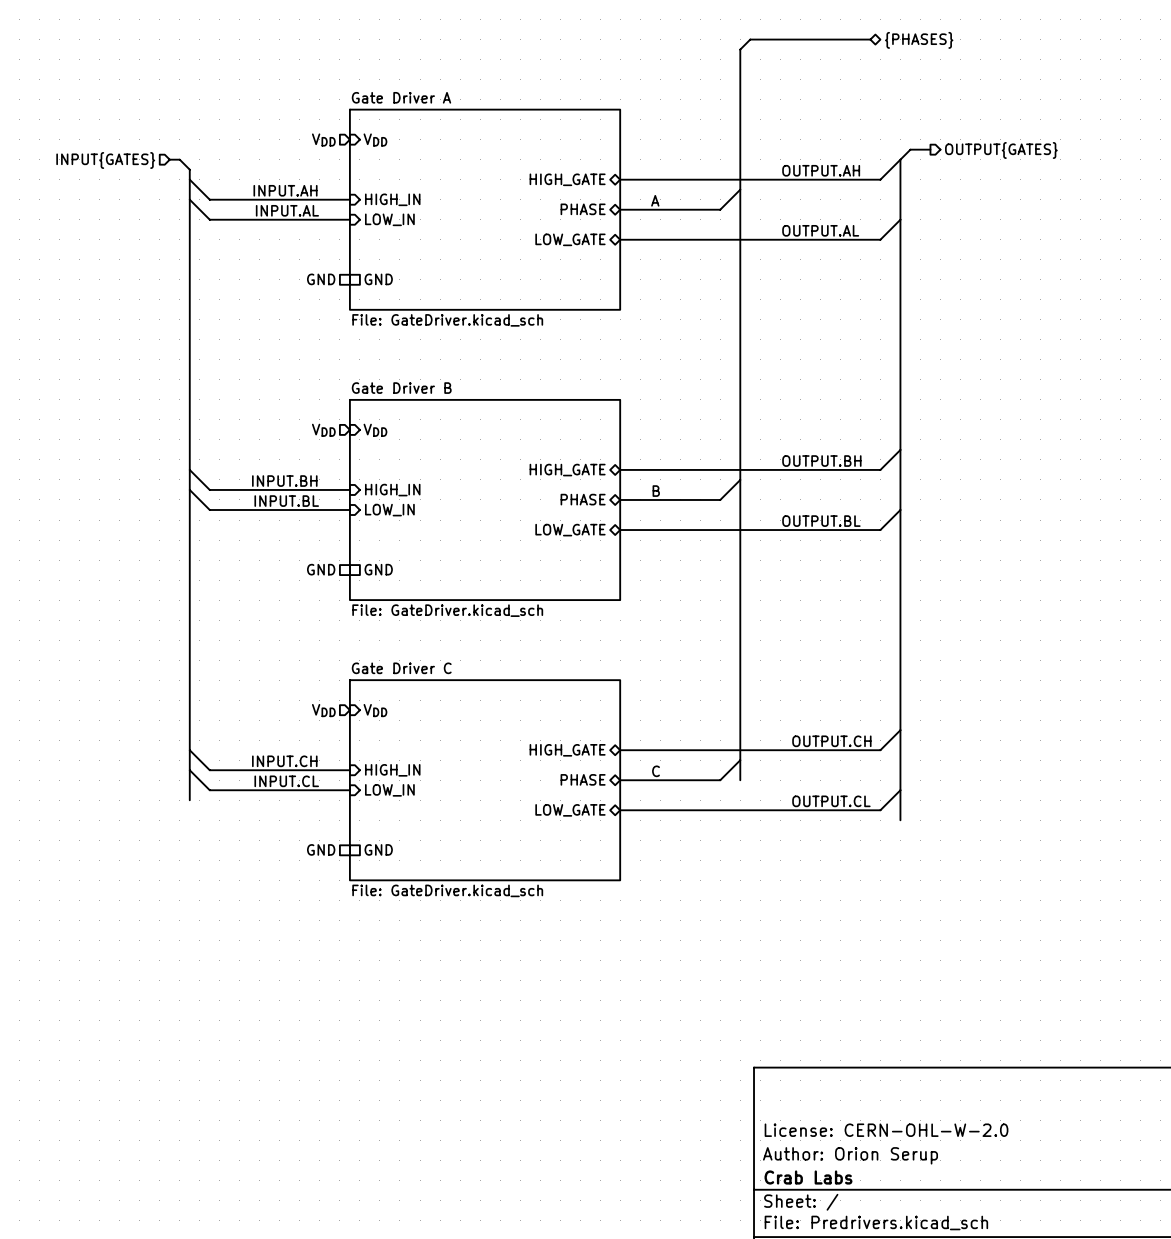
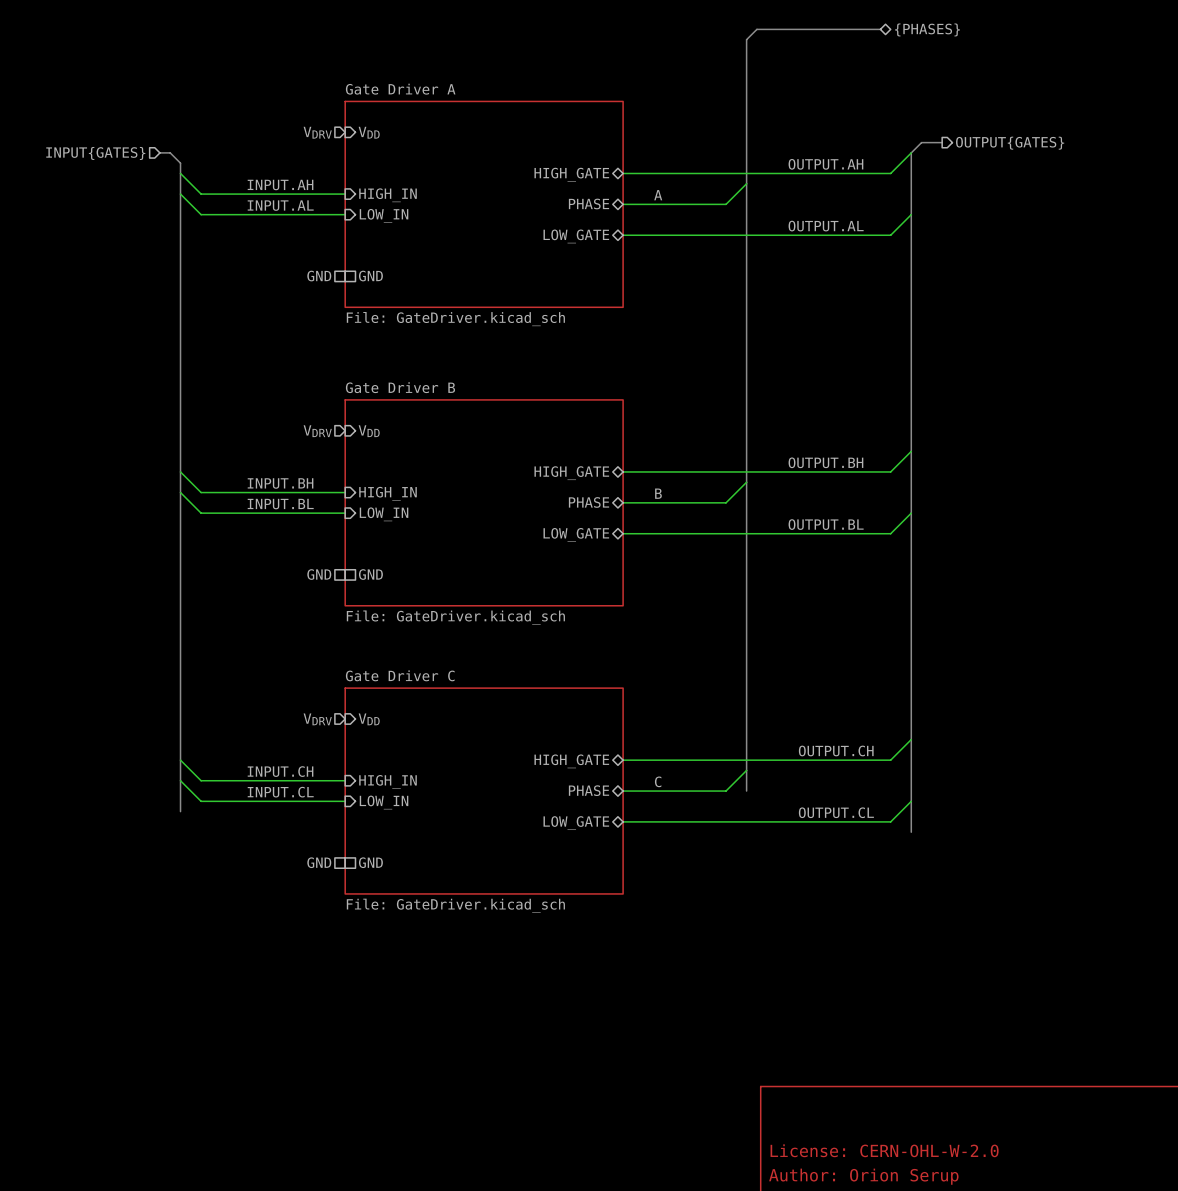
hierarchical label: VDD (323, 140) -> VDRV (317, 132)
hierarchical label: VDD (323, 430) -> VDRV (317, 431)
hierarchical label: VDD (323, 710) -> VDRV (317, 719)

